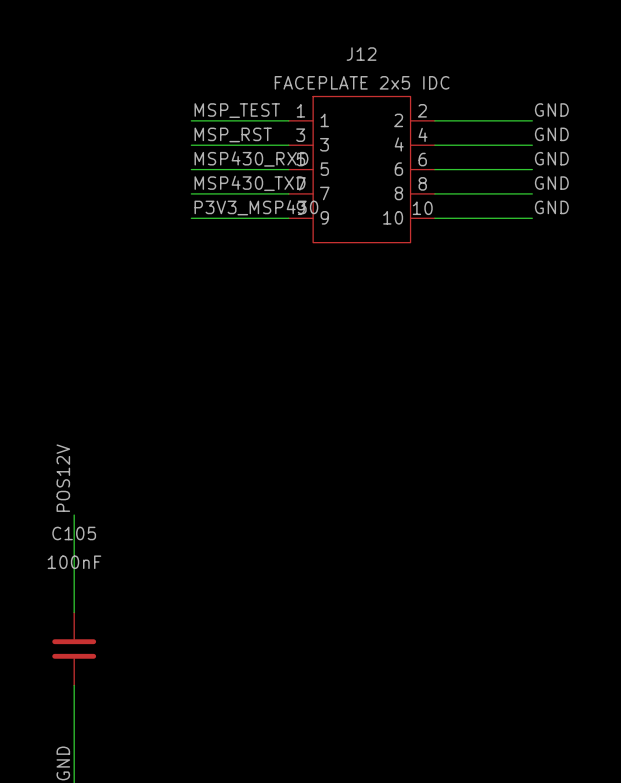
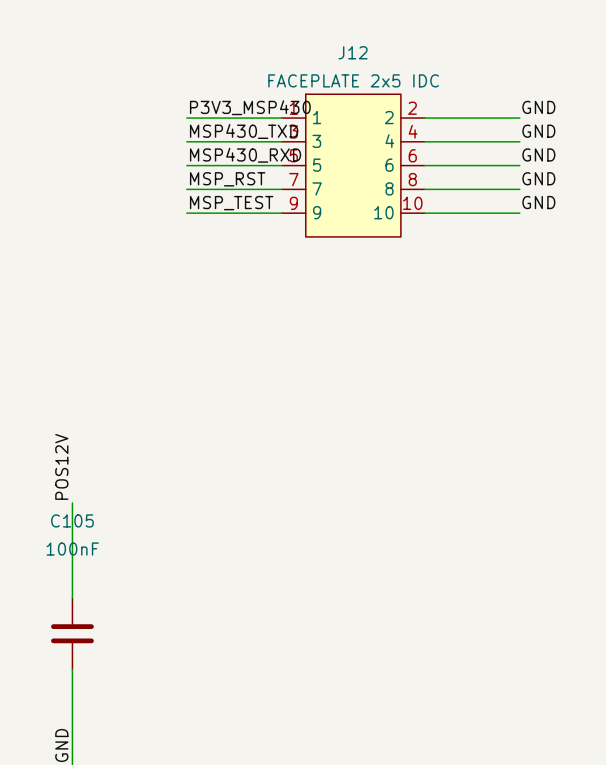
label: MSP_TEST (237, 110) -> P3V3_MSP430 (250, 107)
label: MSP_RST (233, 134) -> MSP430_TXD (244, 131)
label: MSP430_TXD (250, 183) -> MSP_RST (227, 179)
label: P3V3_MSP430 (256, 207) -> MSP_TEST (231, 203)

